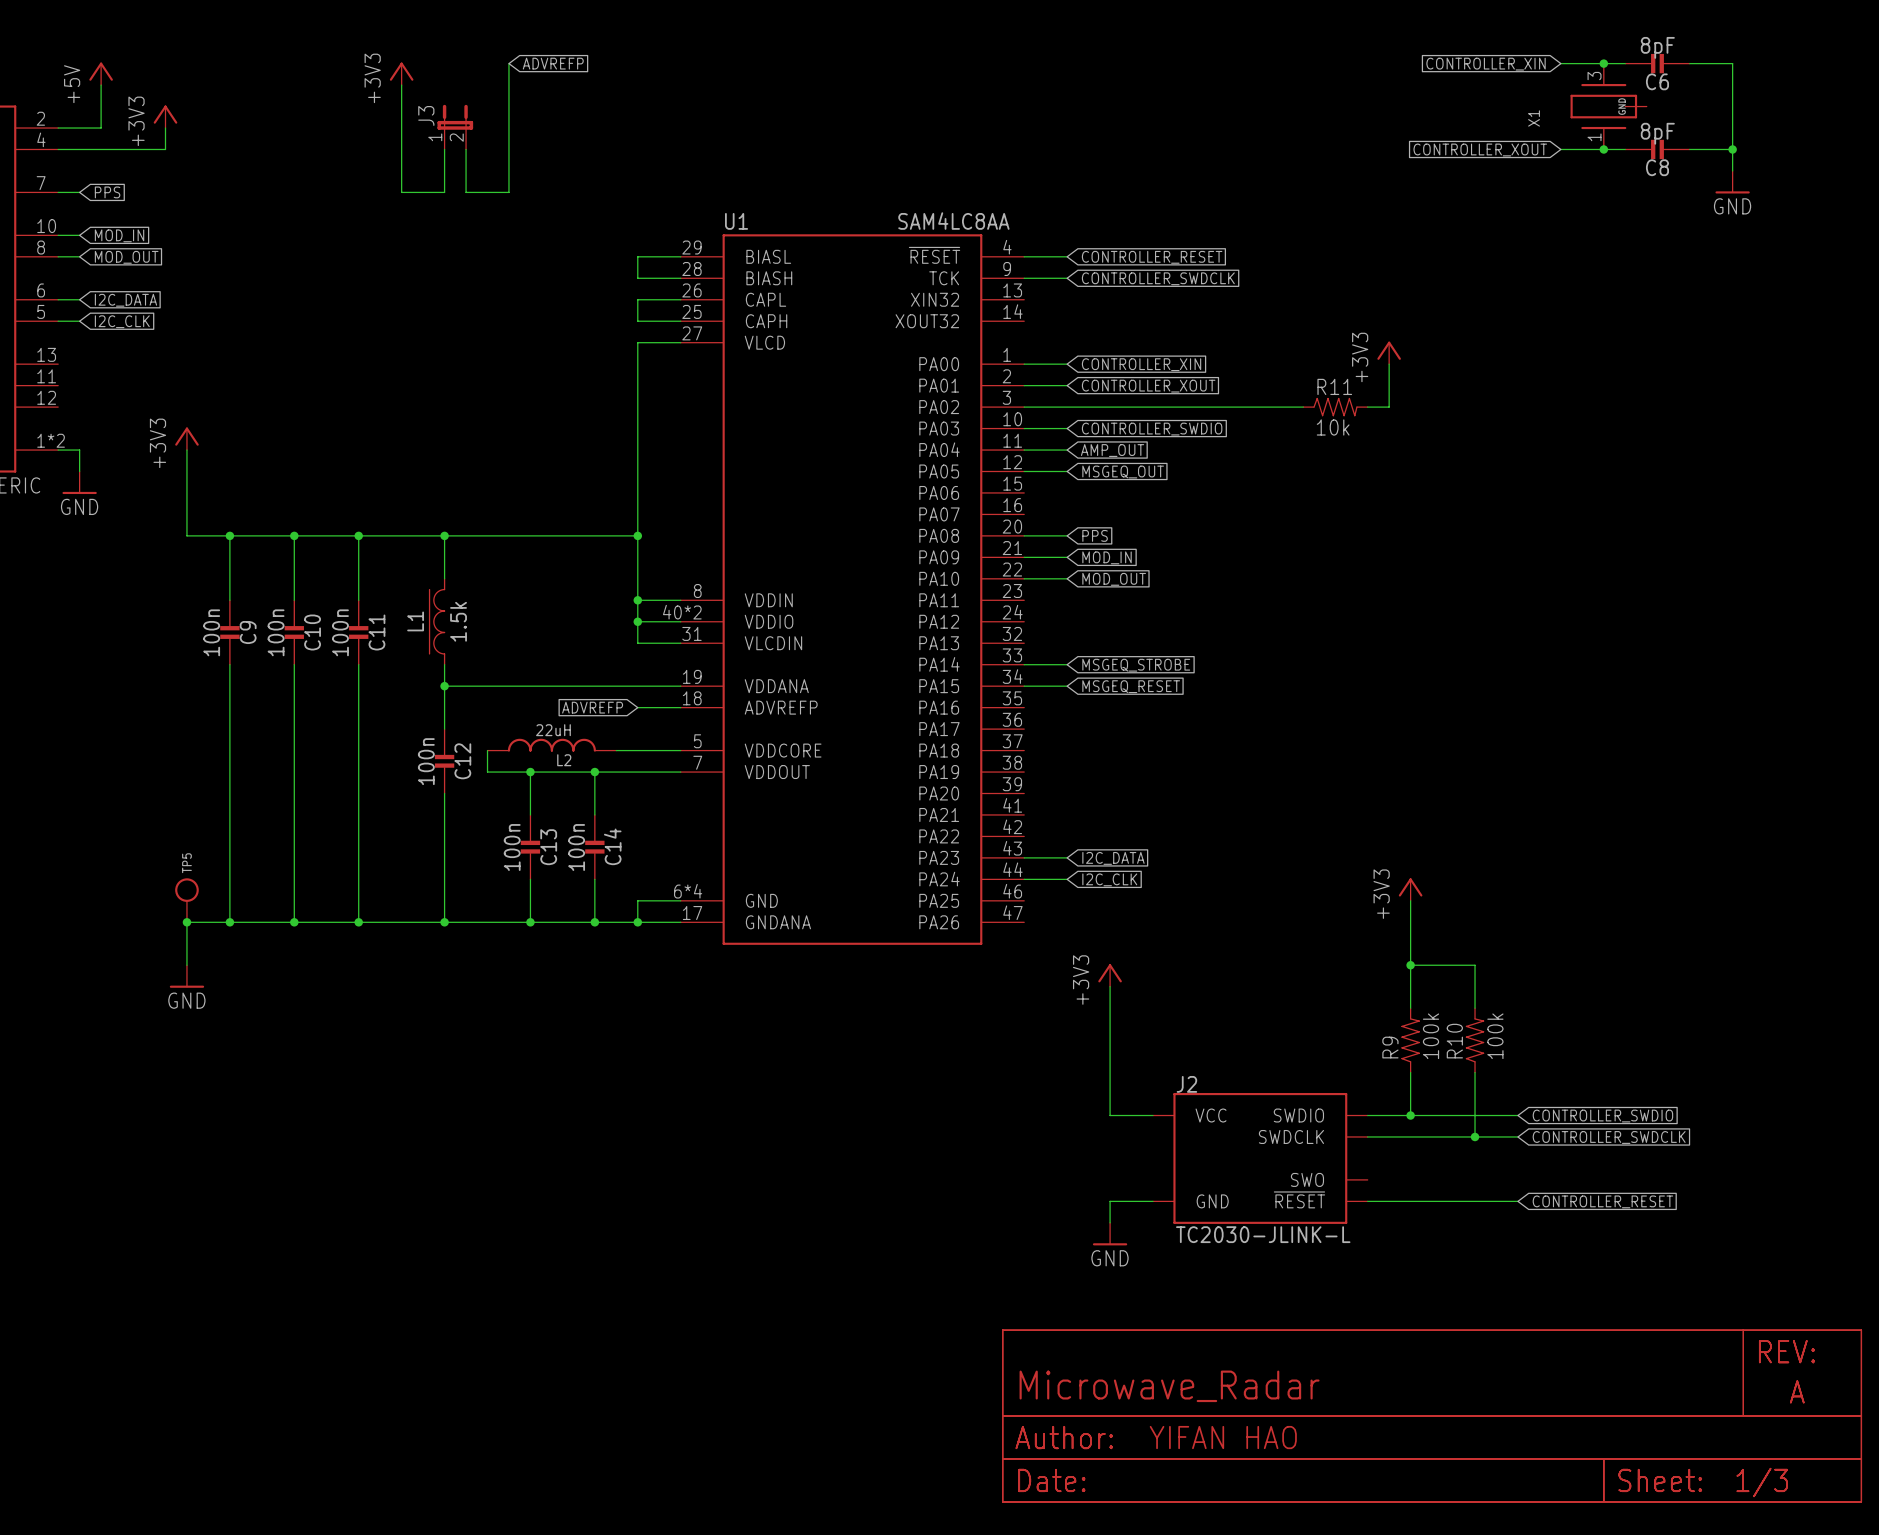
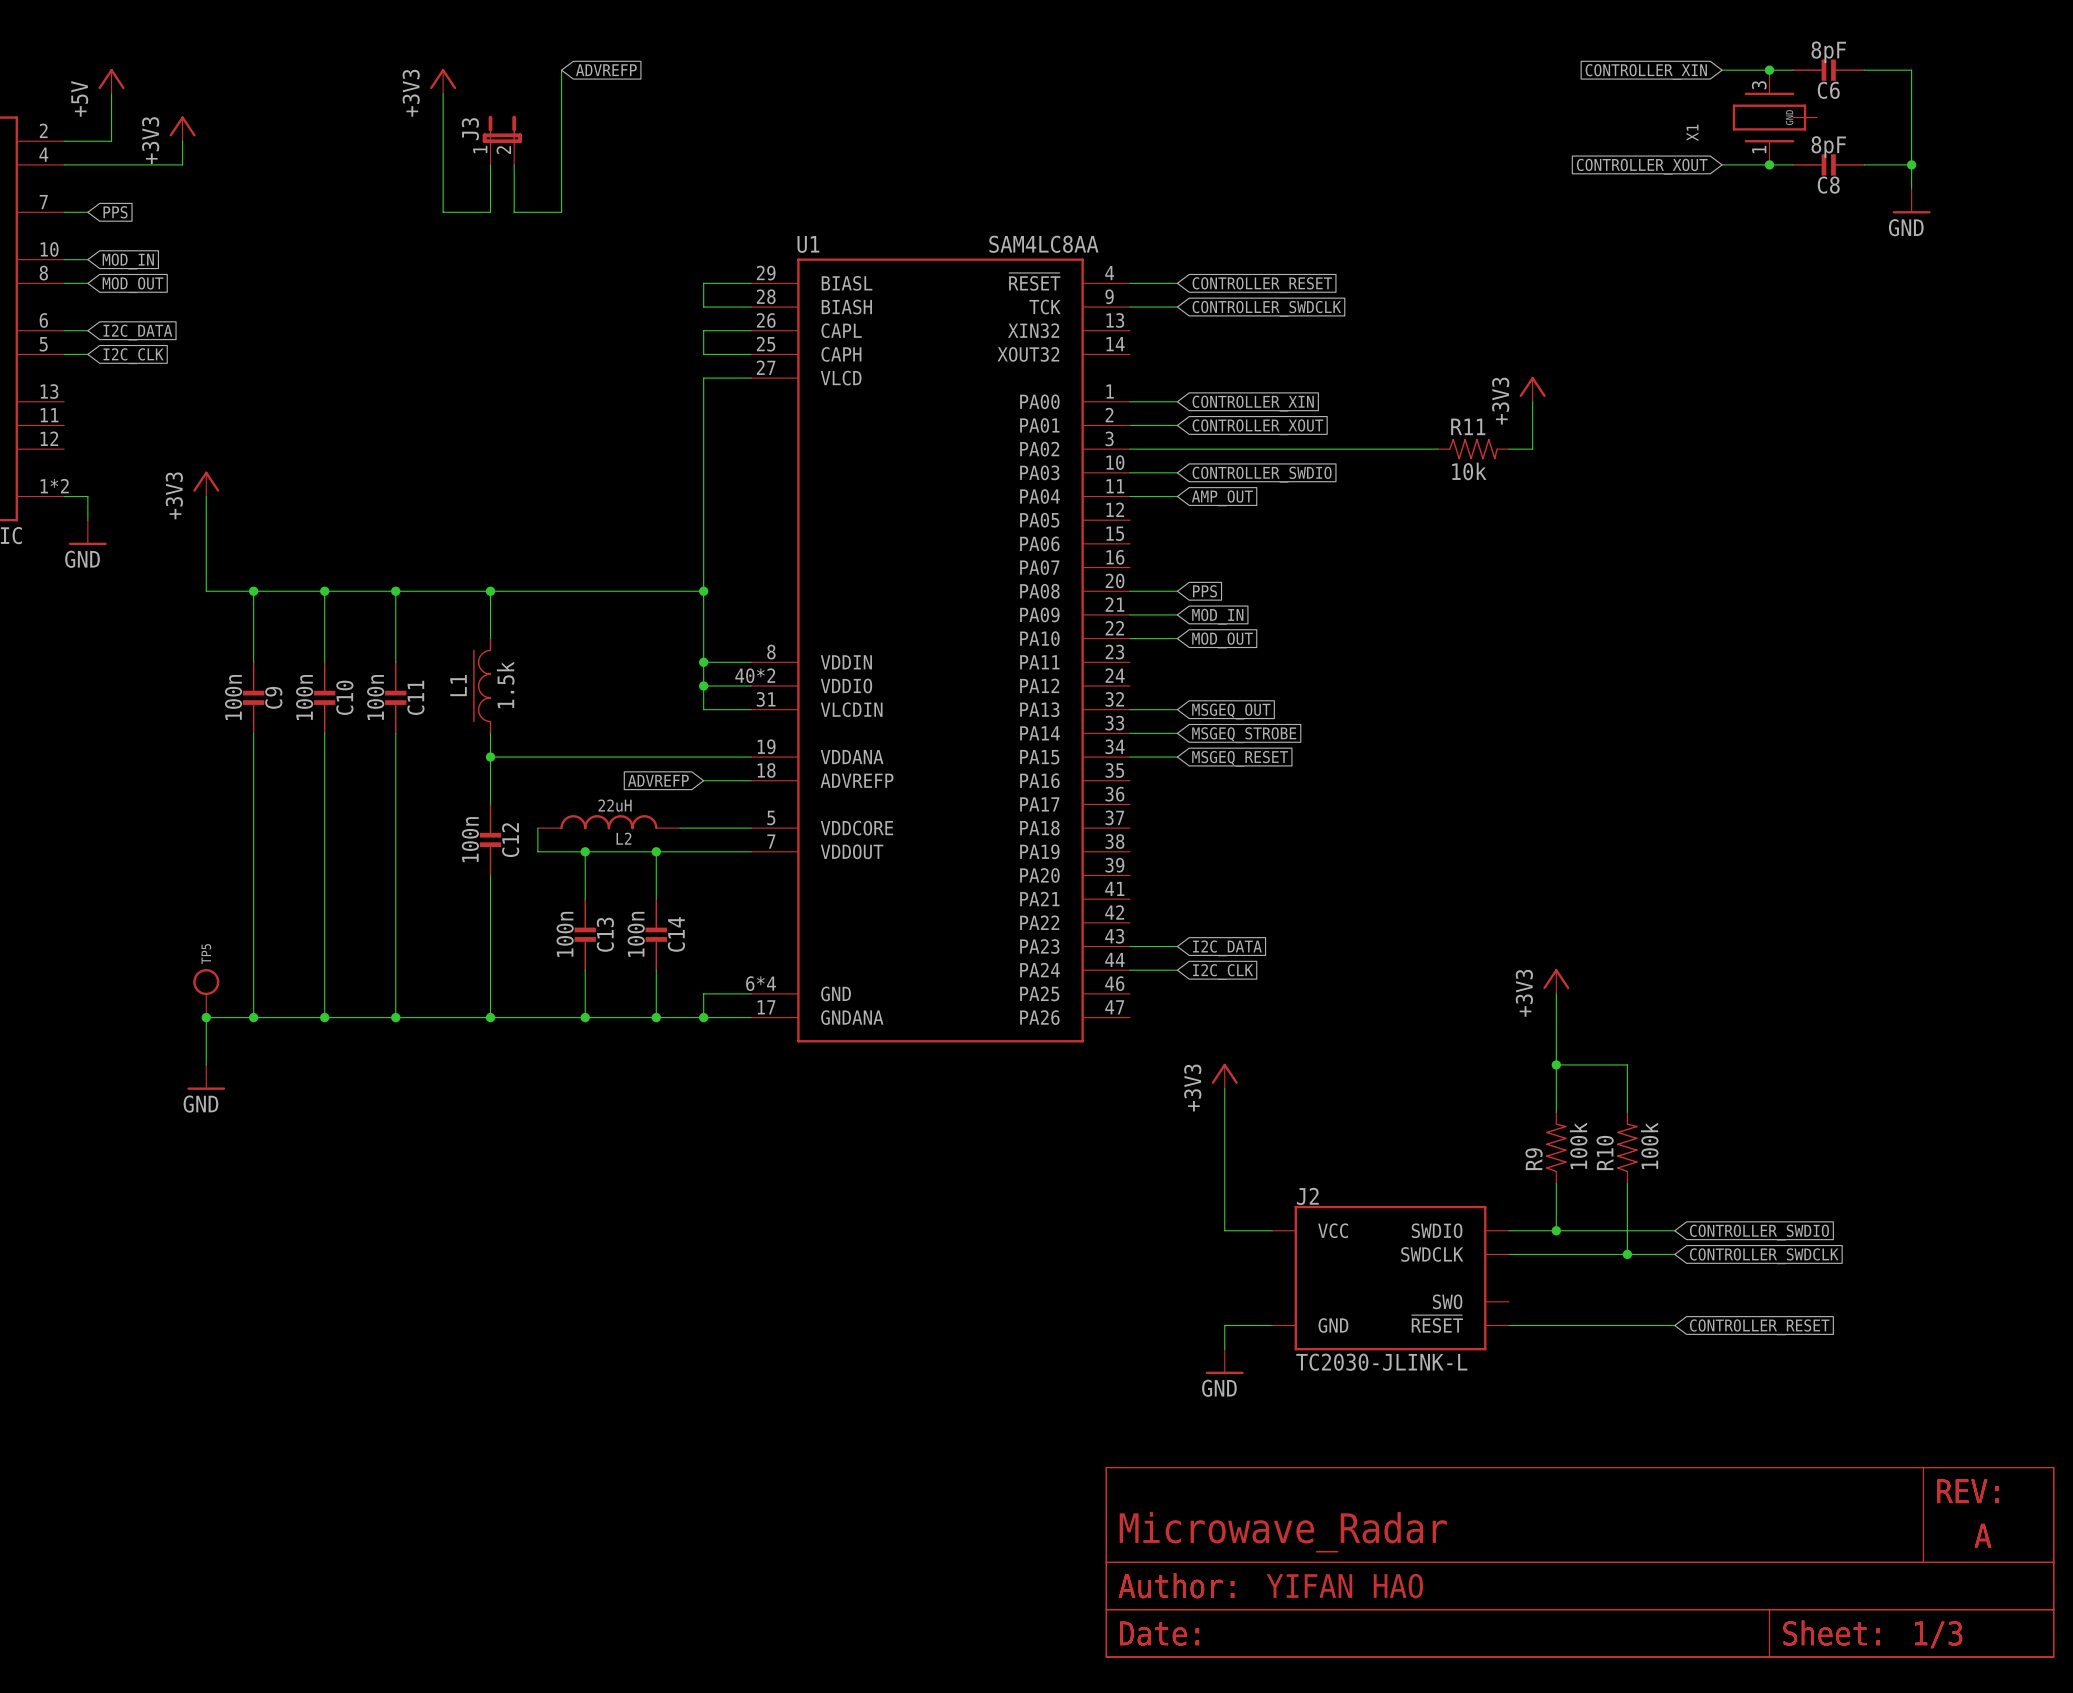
wire: (1024, 471) (1067, 471) -> (1130, 709) (1177, 709)
global label position: MSGEQ_OUT (1123, 472) -> MSGEQ_OUT (1231, 711)

